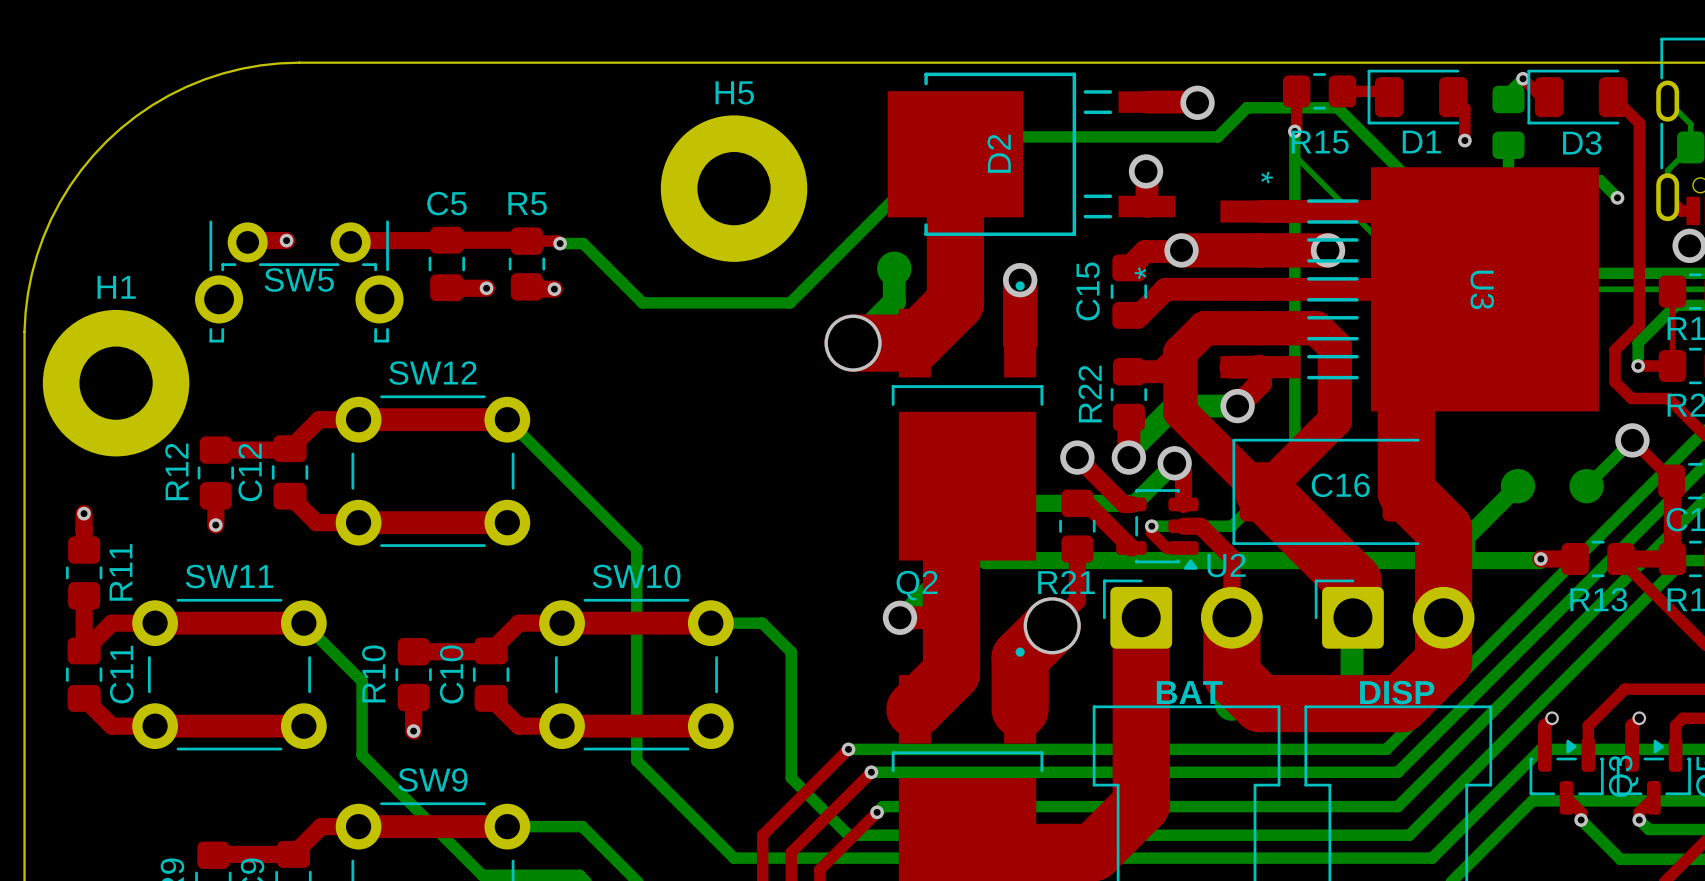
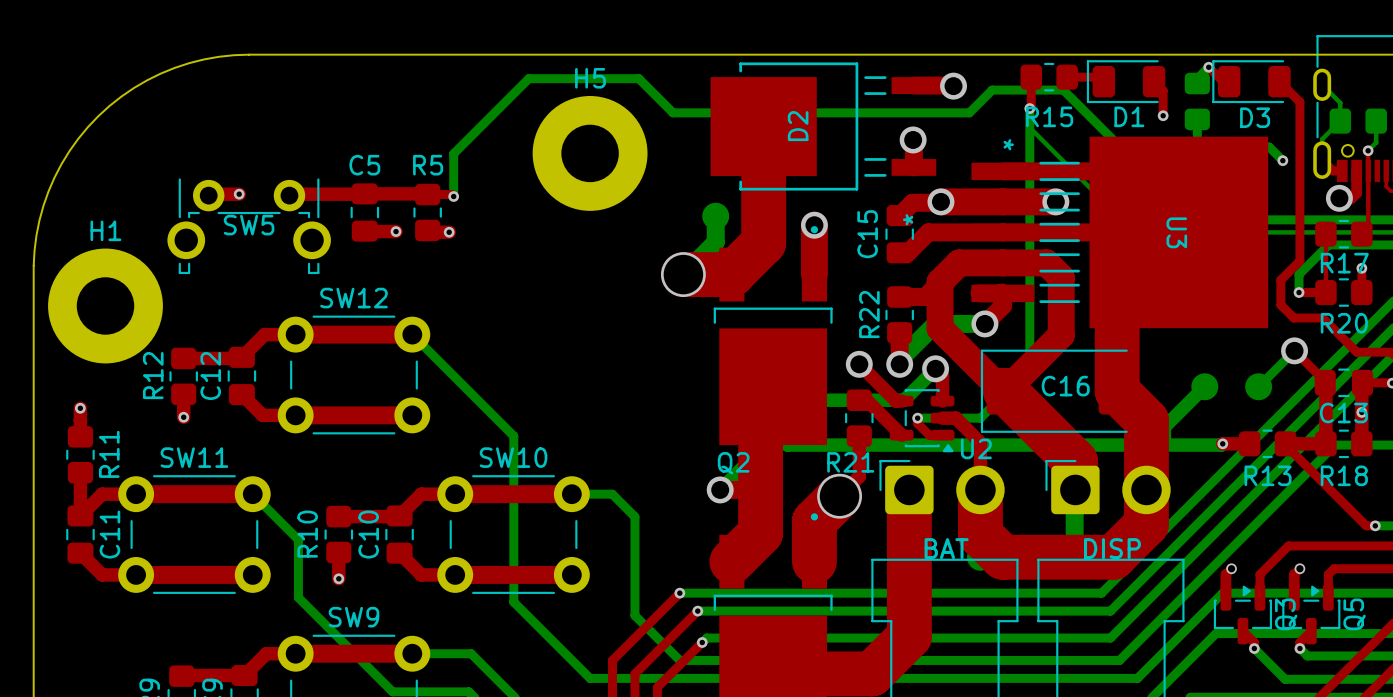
bottom track: (956, 136) (790, 302) (642, 302) (583, 243) (560, 243) -> (764, 112) (673, 112) (638, 78) (528, 78) (453, 153) (453, 196)

